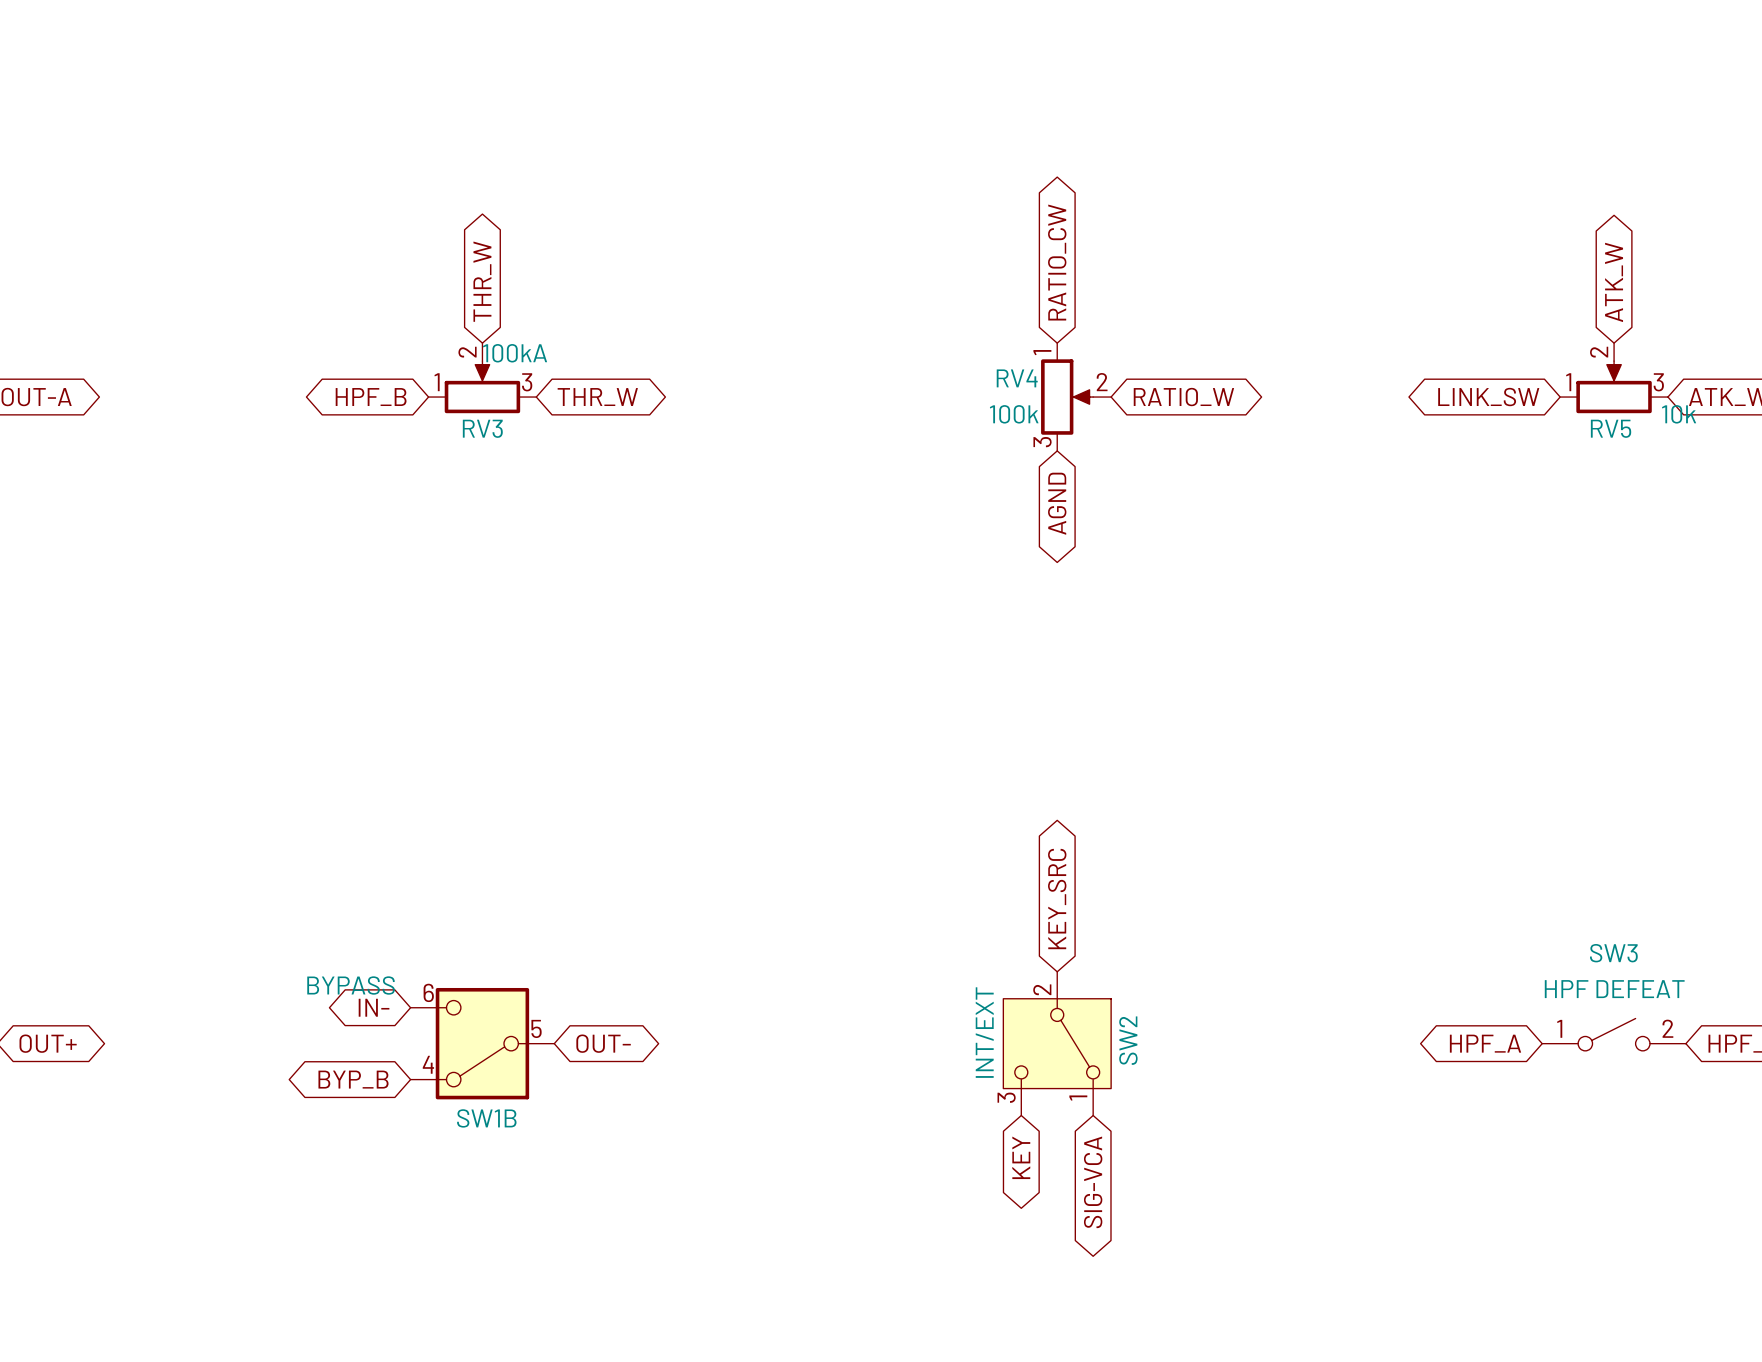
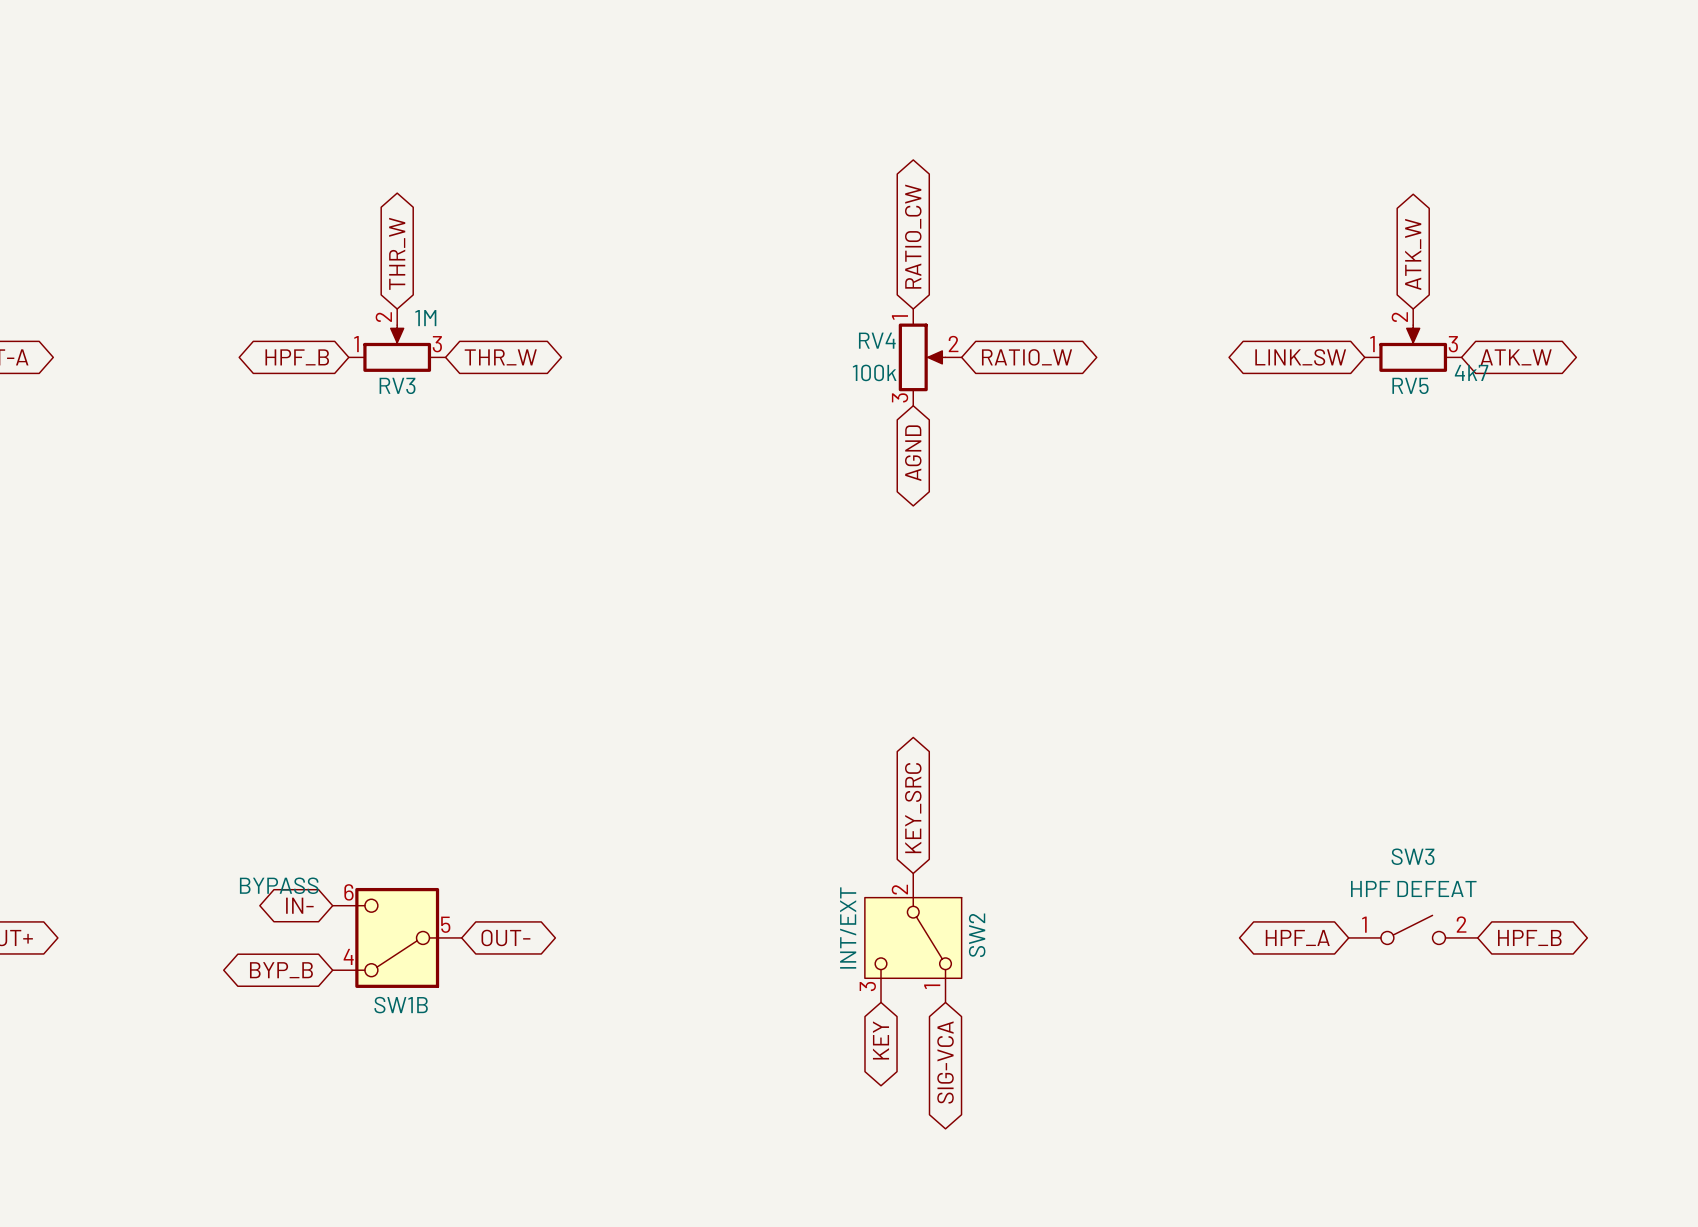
RV3 value: 100kA (515, 353) -> 1M (425, 318)
RV5 value: 10k (1679, 414) -> 4k7 (1471, 372)

